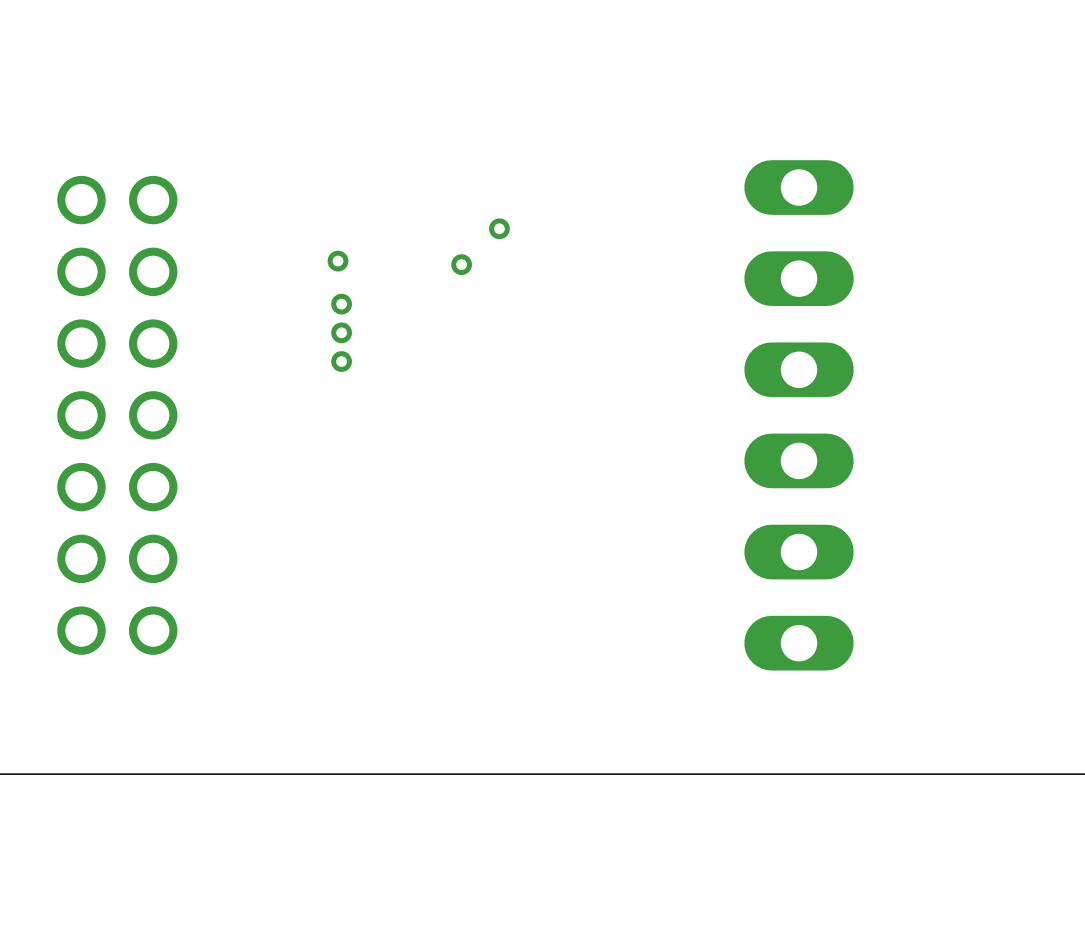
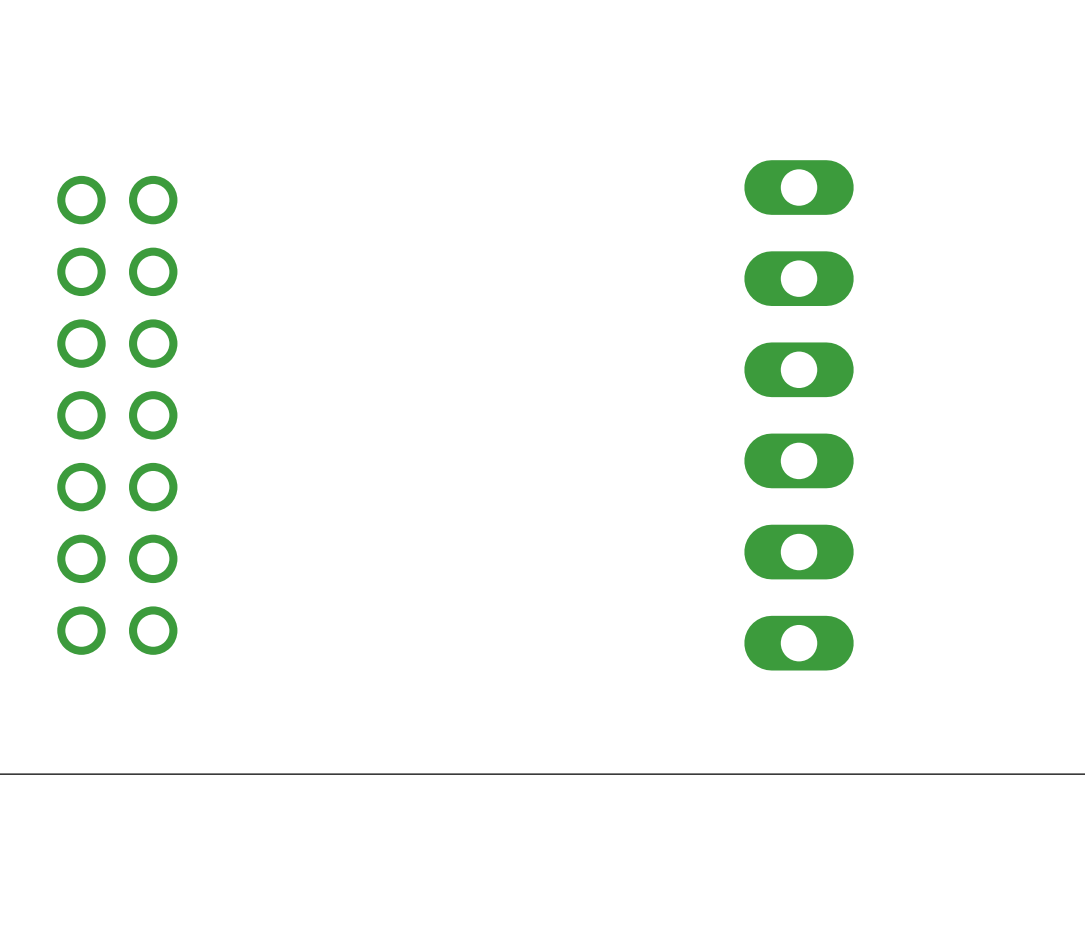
via: (499, 228) -> none
via: (337, 261) -> none
via: (461, 264) -> none
via: (341, 304) -> none
via: (341, 332) -> none
via: (341, 361) -> none

